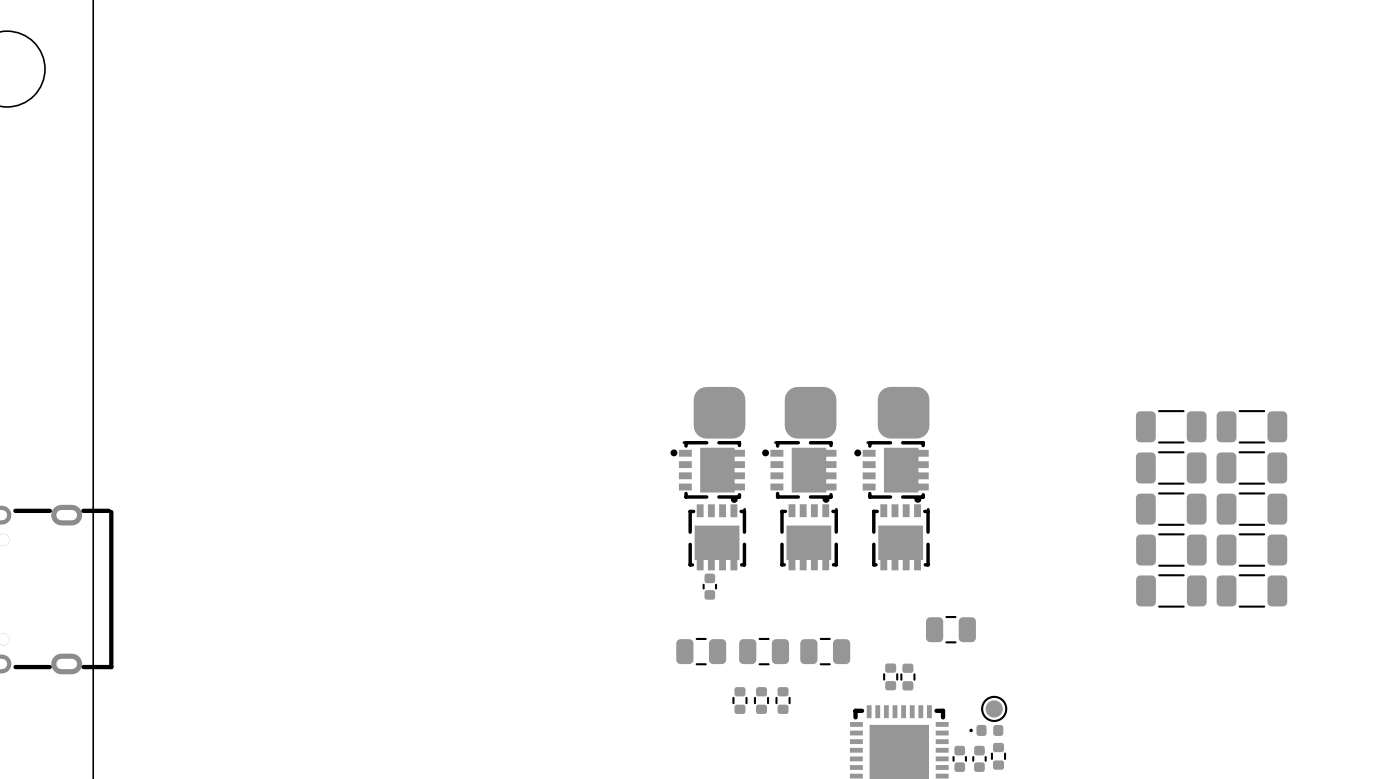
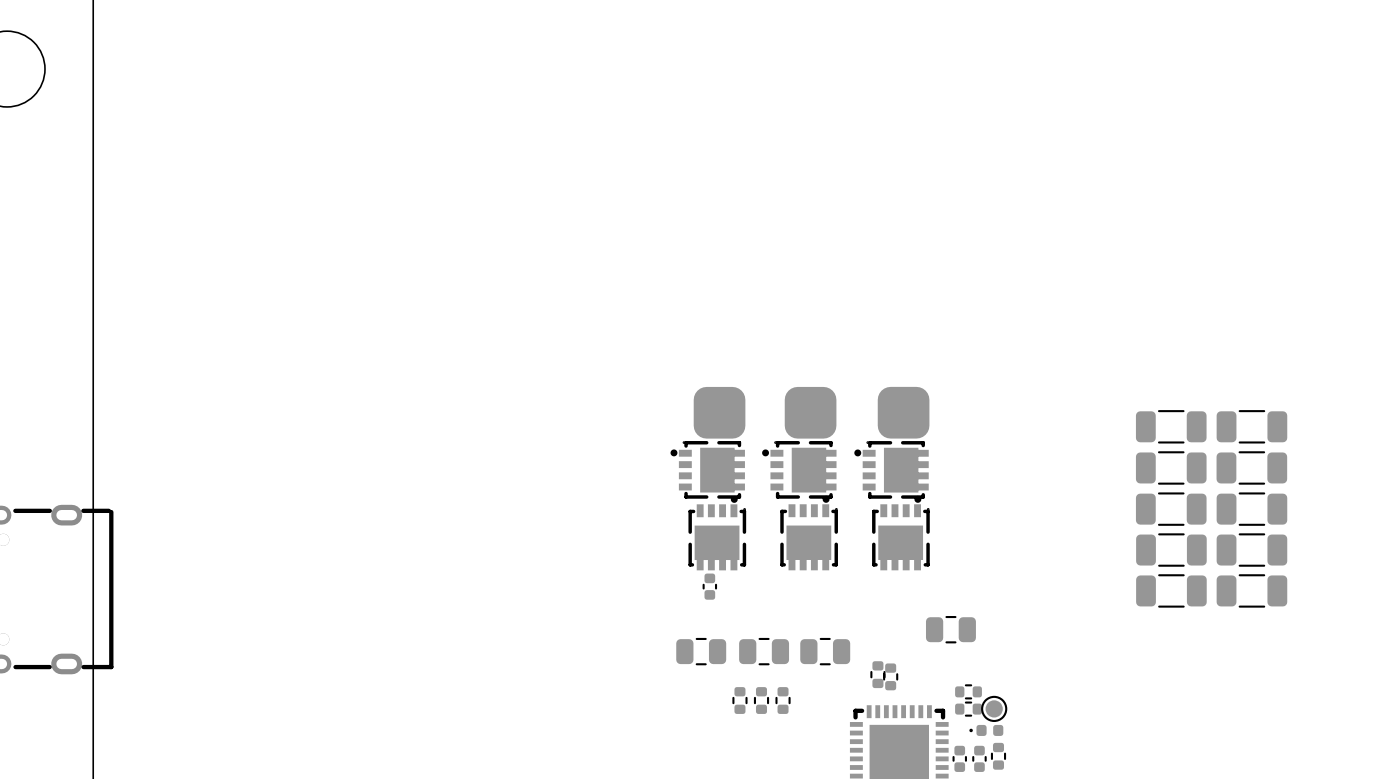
part position: (907, 677) -> (877, 674)
part: none -> (968, 691)
part: none -> (968, 709)

